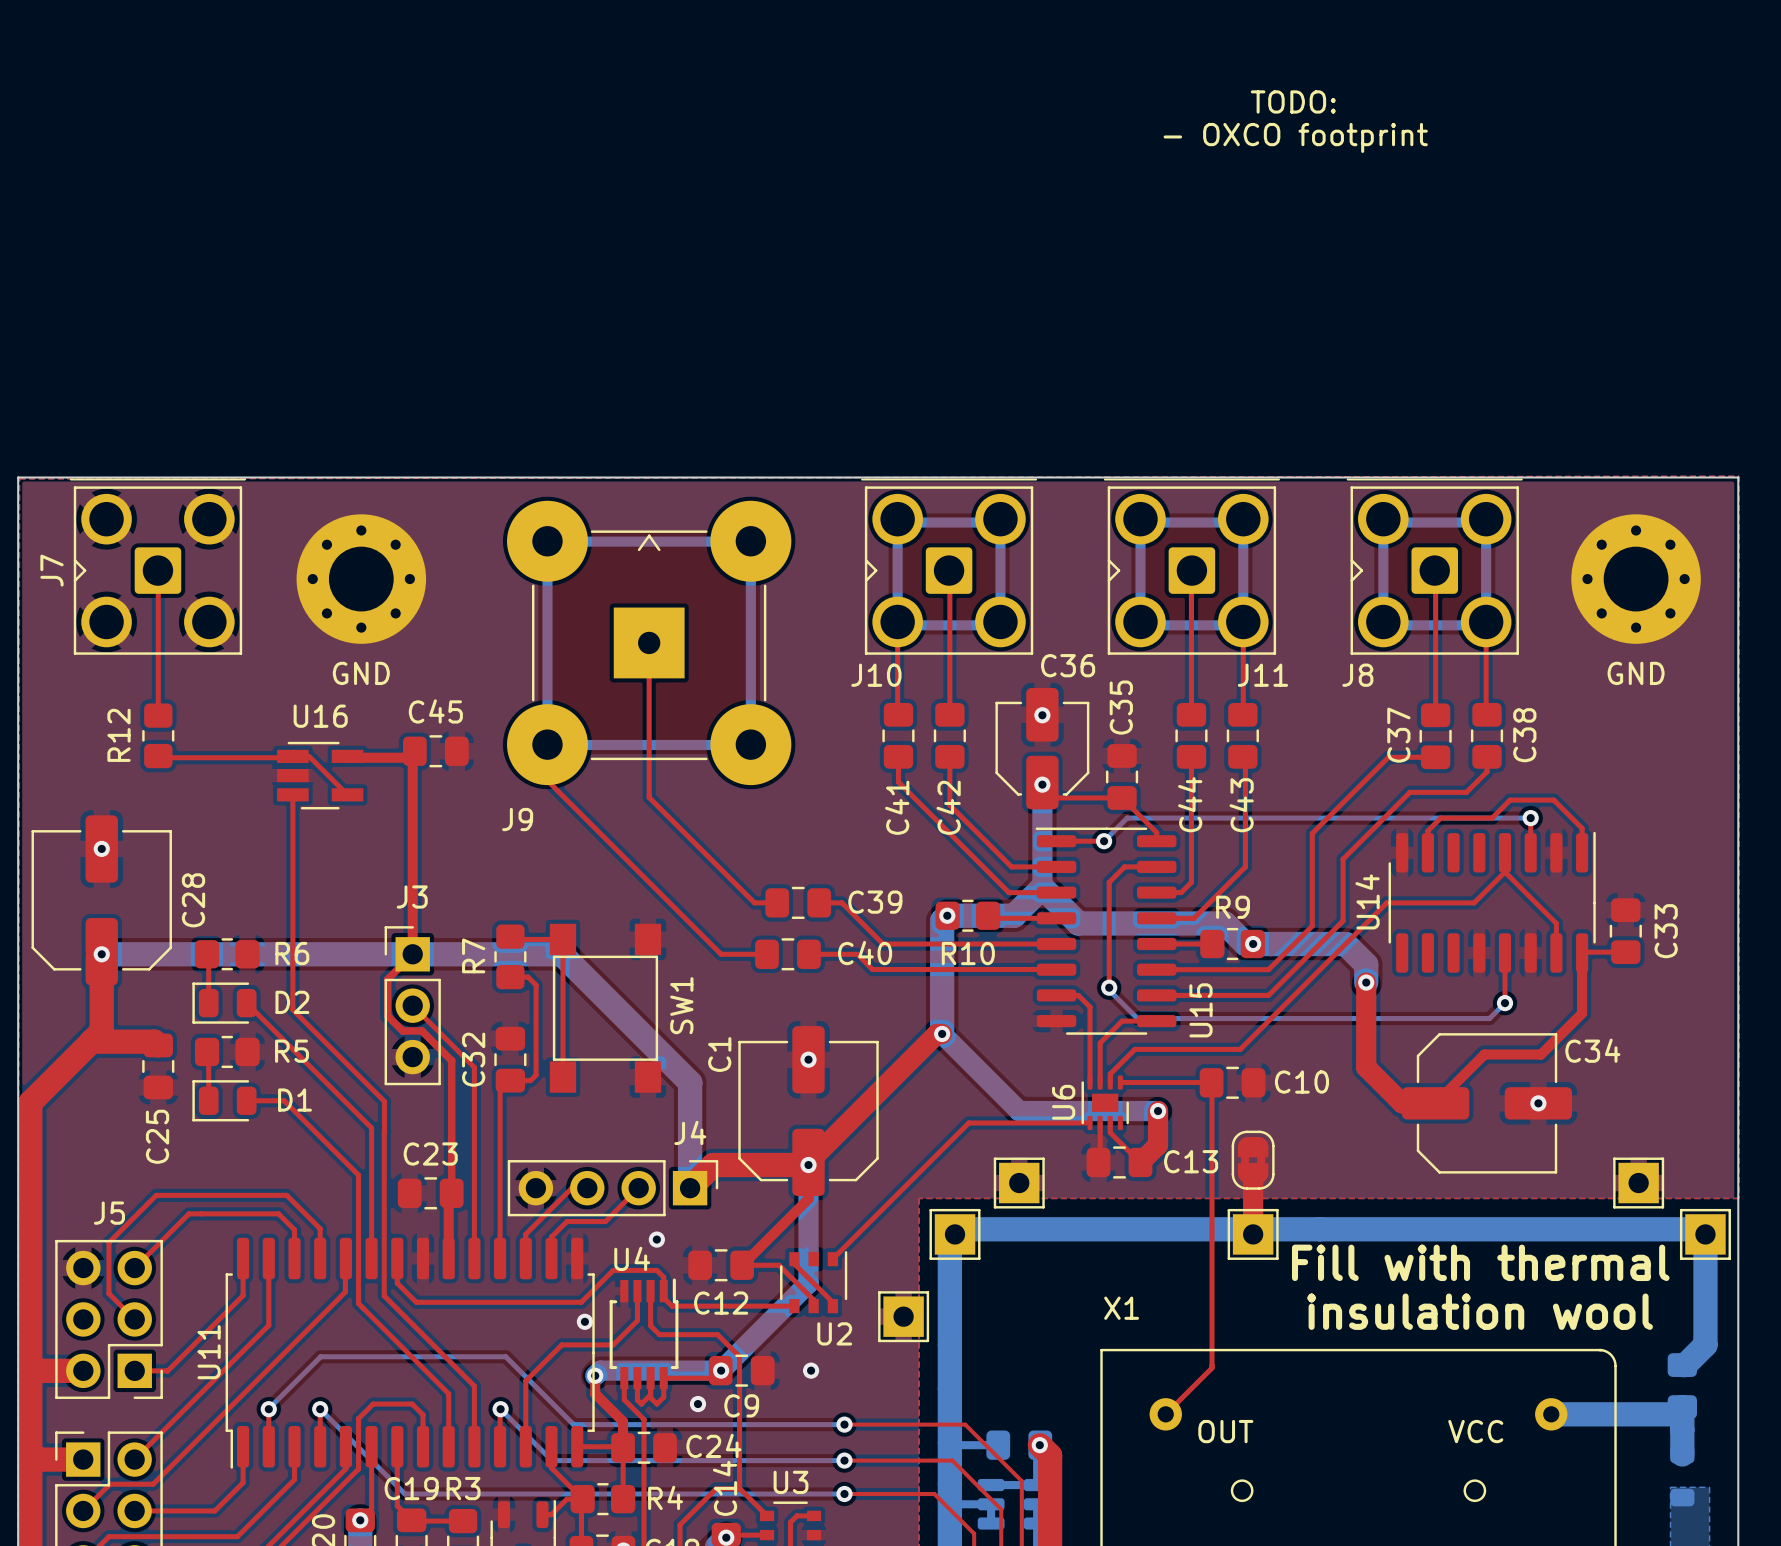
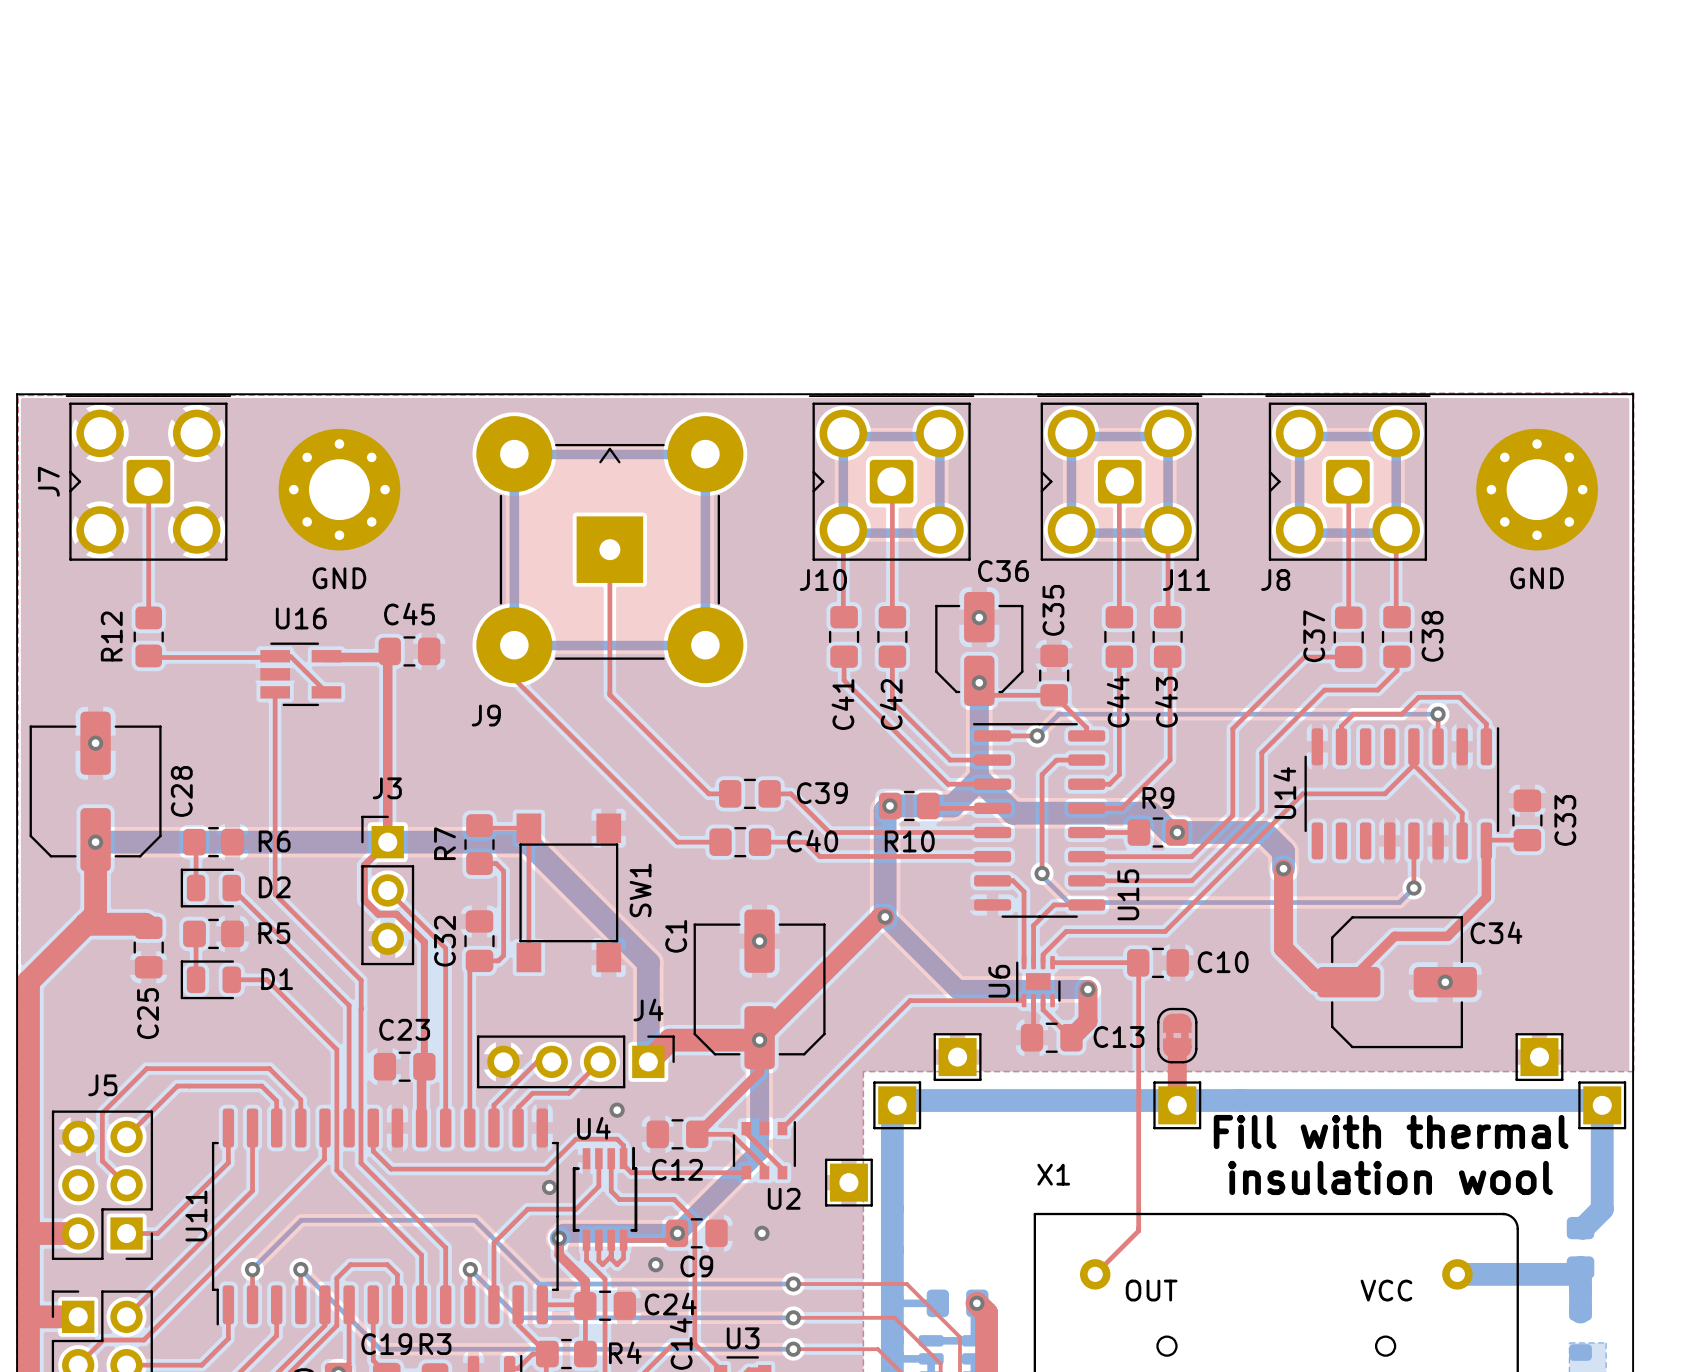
text: TODO: (1293, 101) -> none
text: - OXCO footprint (1295, 137) -> none

